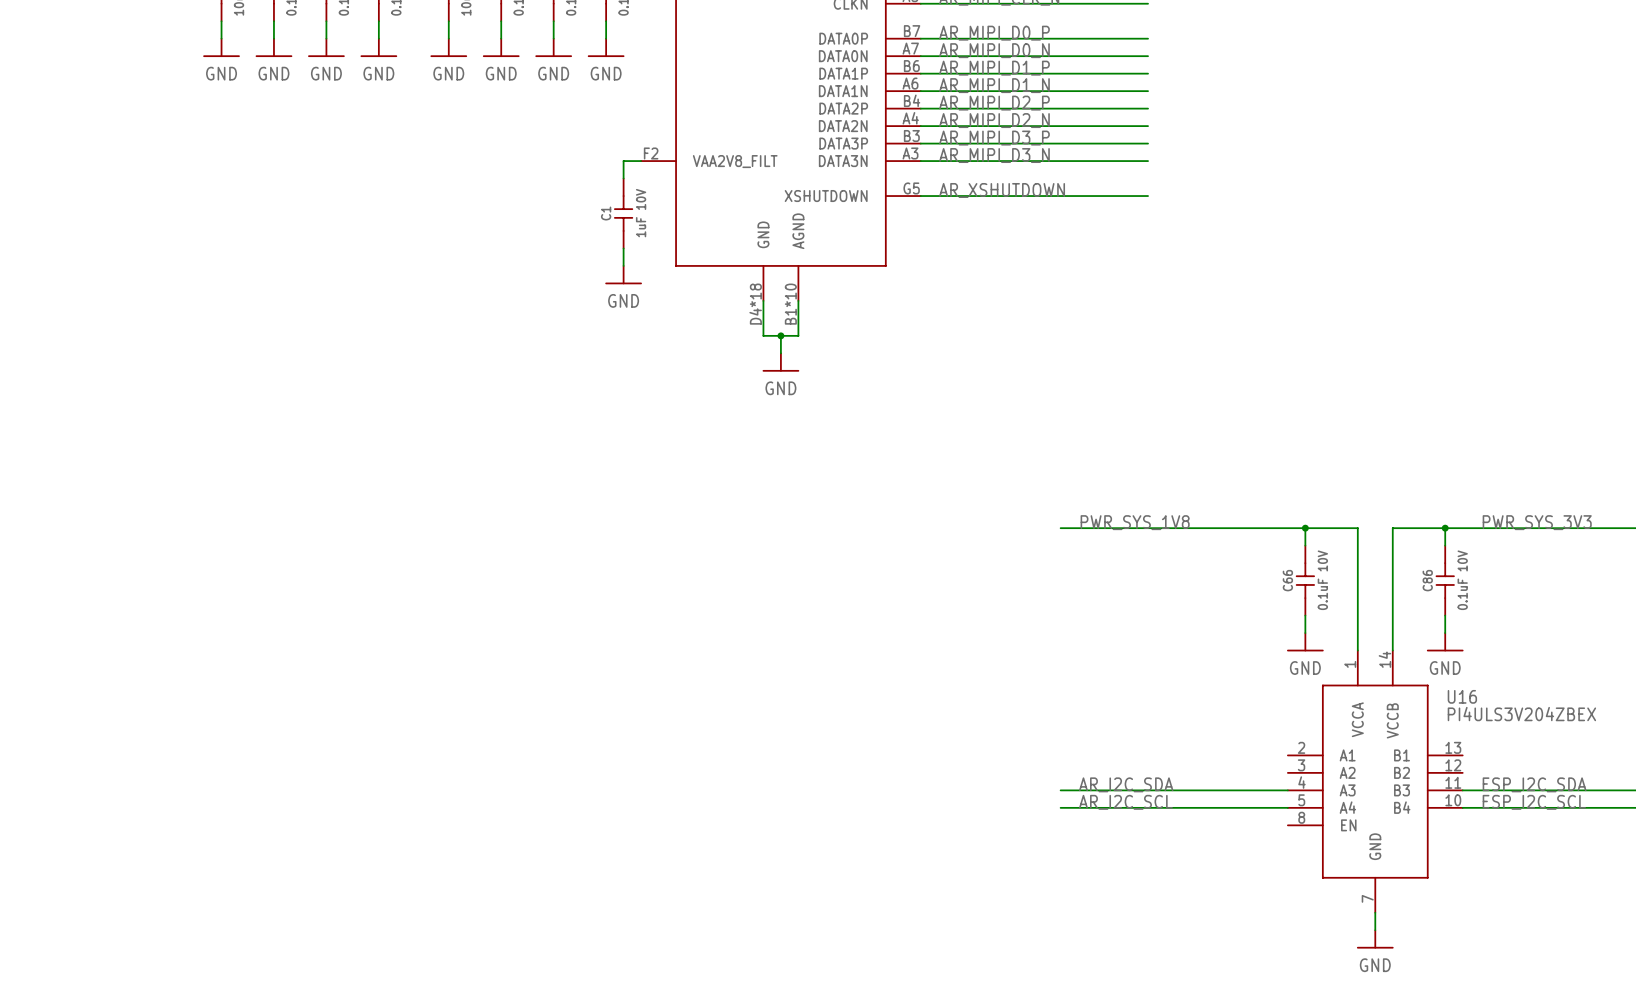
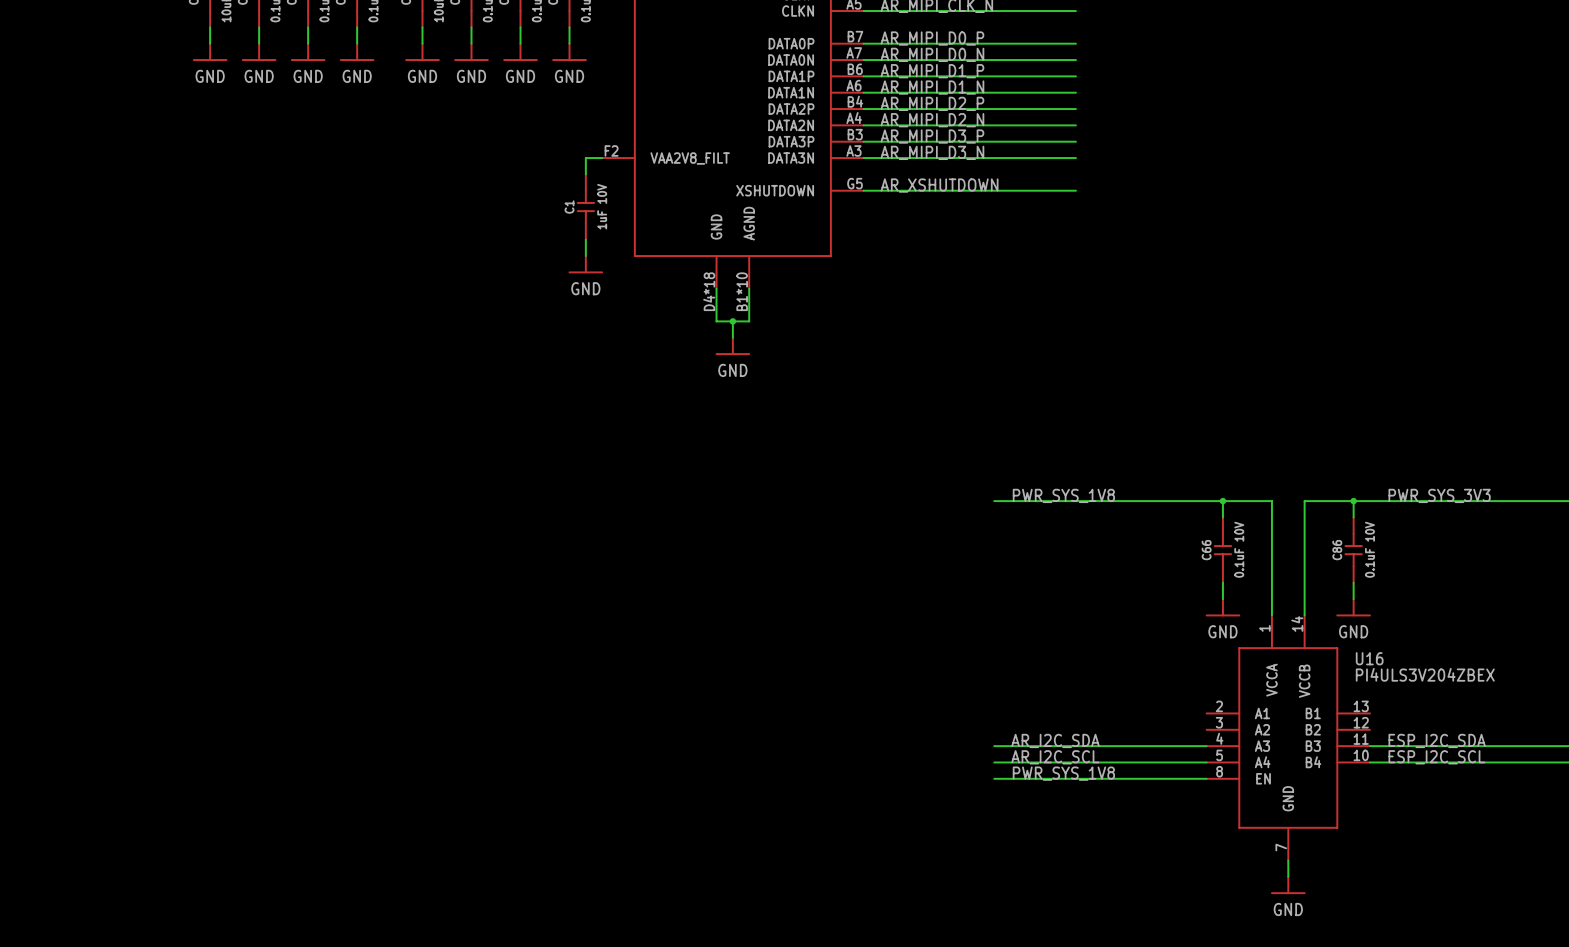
label: none -> PWR_SYS_1V8 (1063, 773)
wire: none -> (994, 778) (1206, 778)

